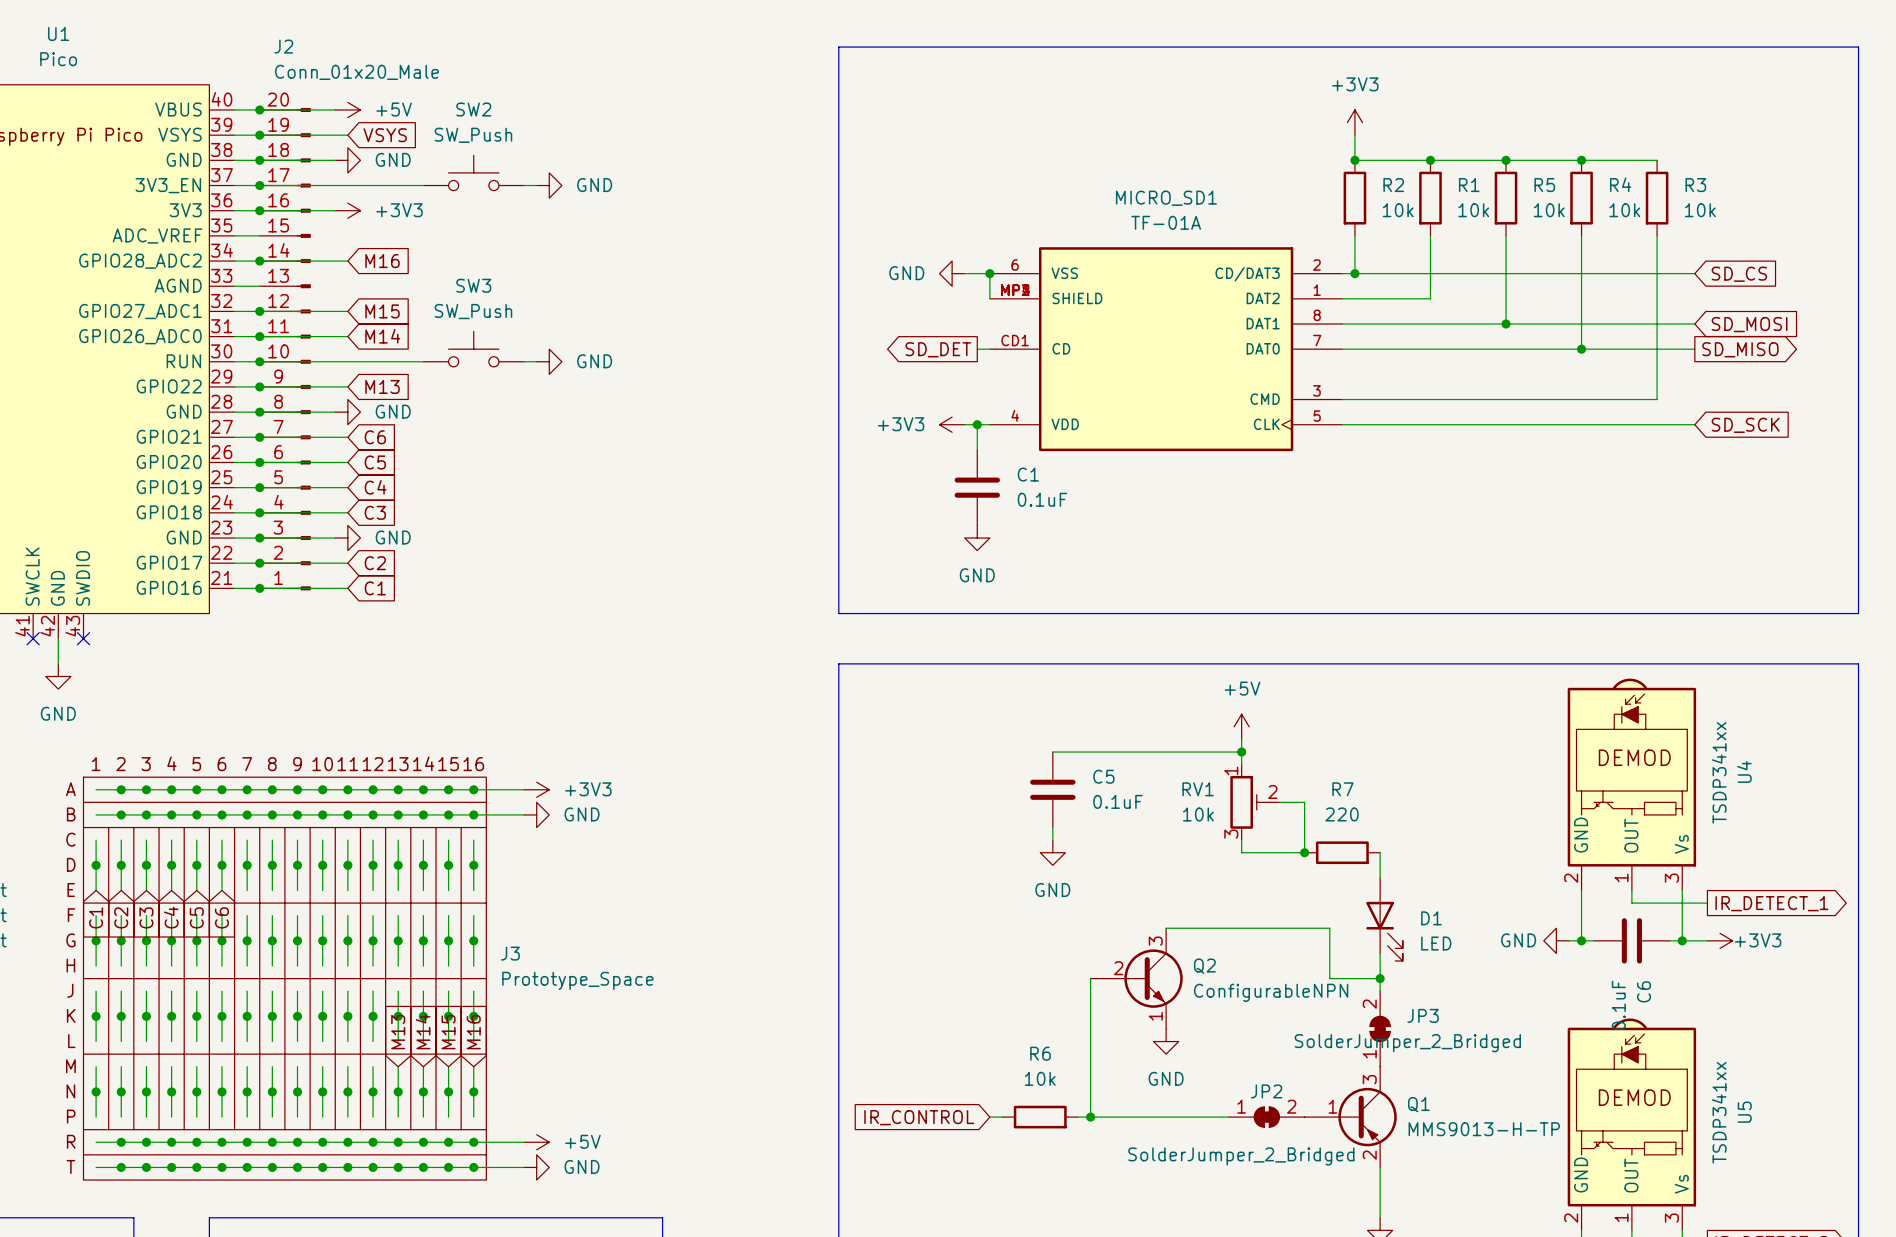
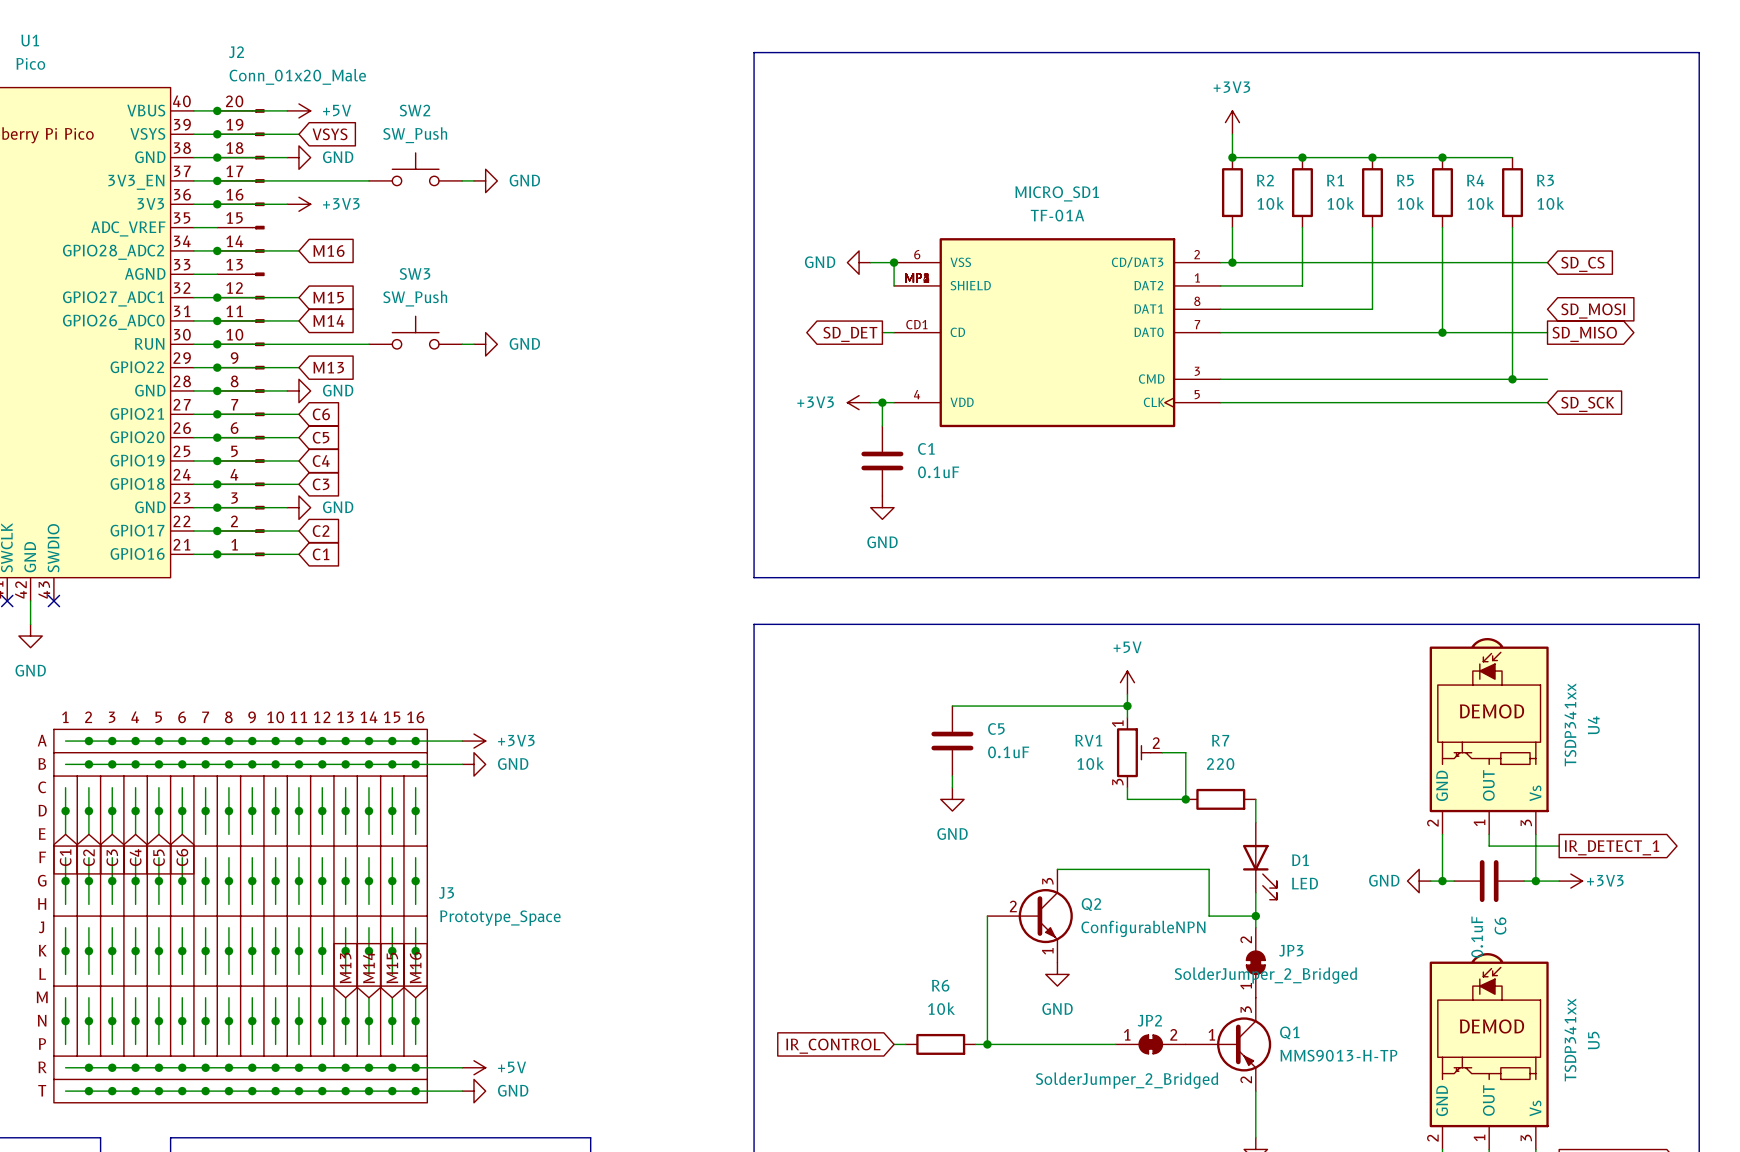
wire: (1506, 324) (1694, 324) -> none
junction: (1506, 324) -> none
wire: none -> (1512, 379) (1547, 379)
junction: none -> (1512, 379)

